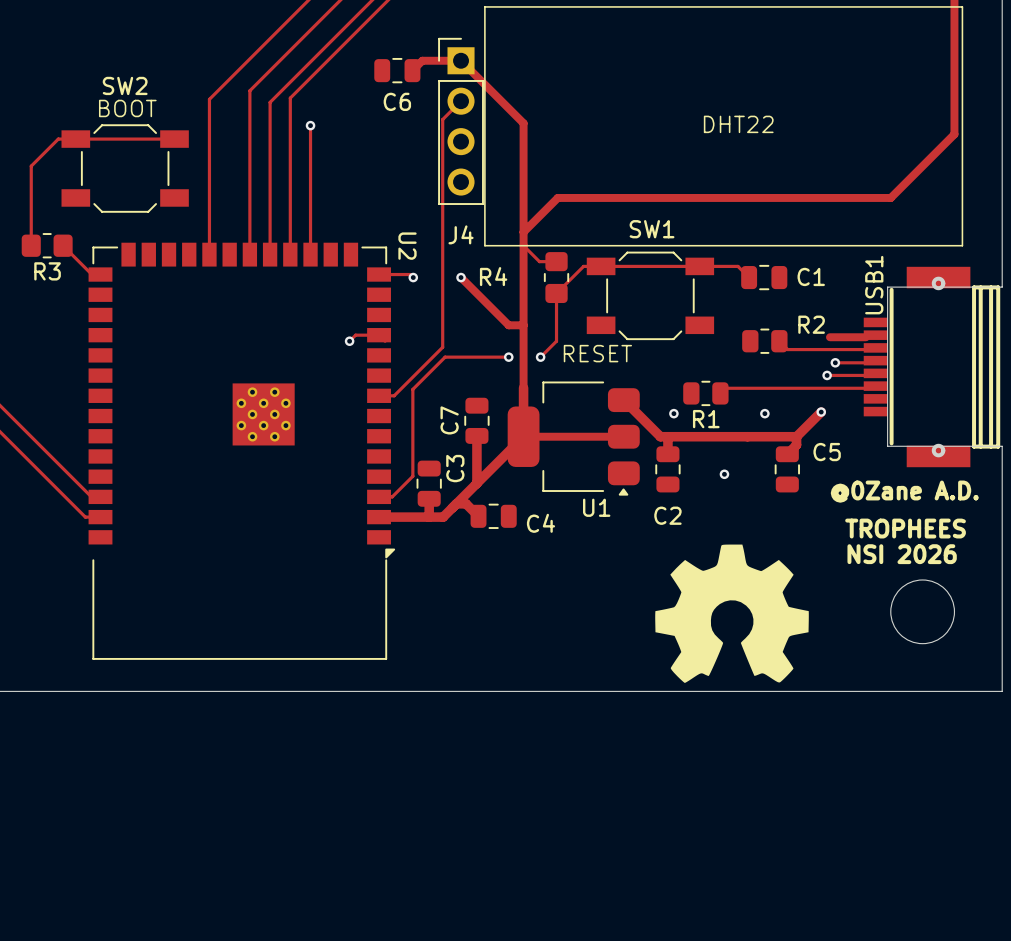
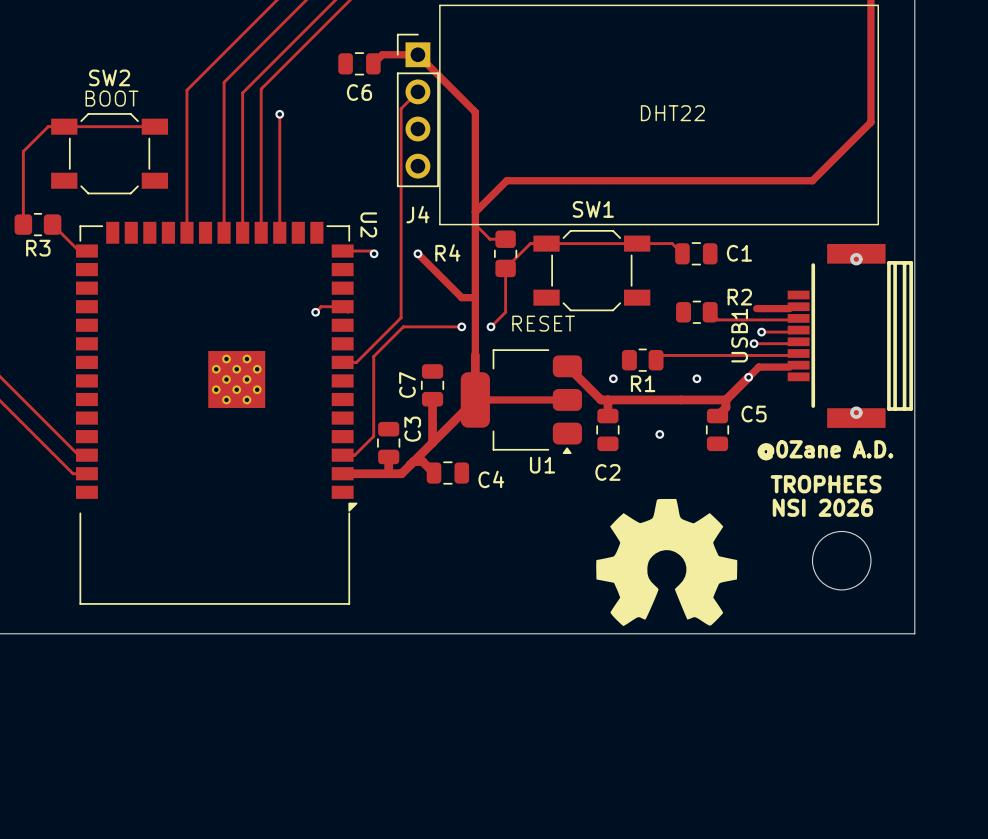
USB1 name position: USB1 (874, 285) -> USB1 (739, 335)
board edge: (1002, 287) (887, 287) (887, 446) (1002, 446) -> (914, 262) (914, 408)
track: none -> (789, 367) (758, 367) (748, 377)

